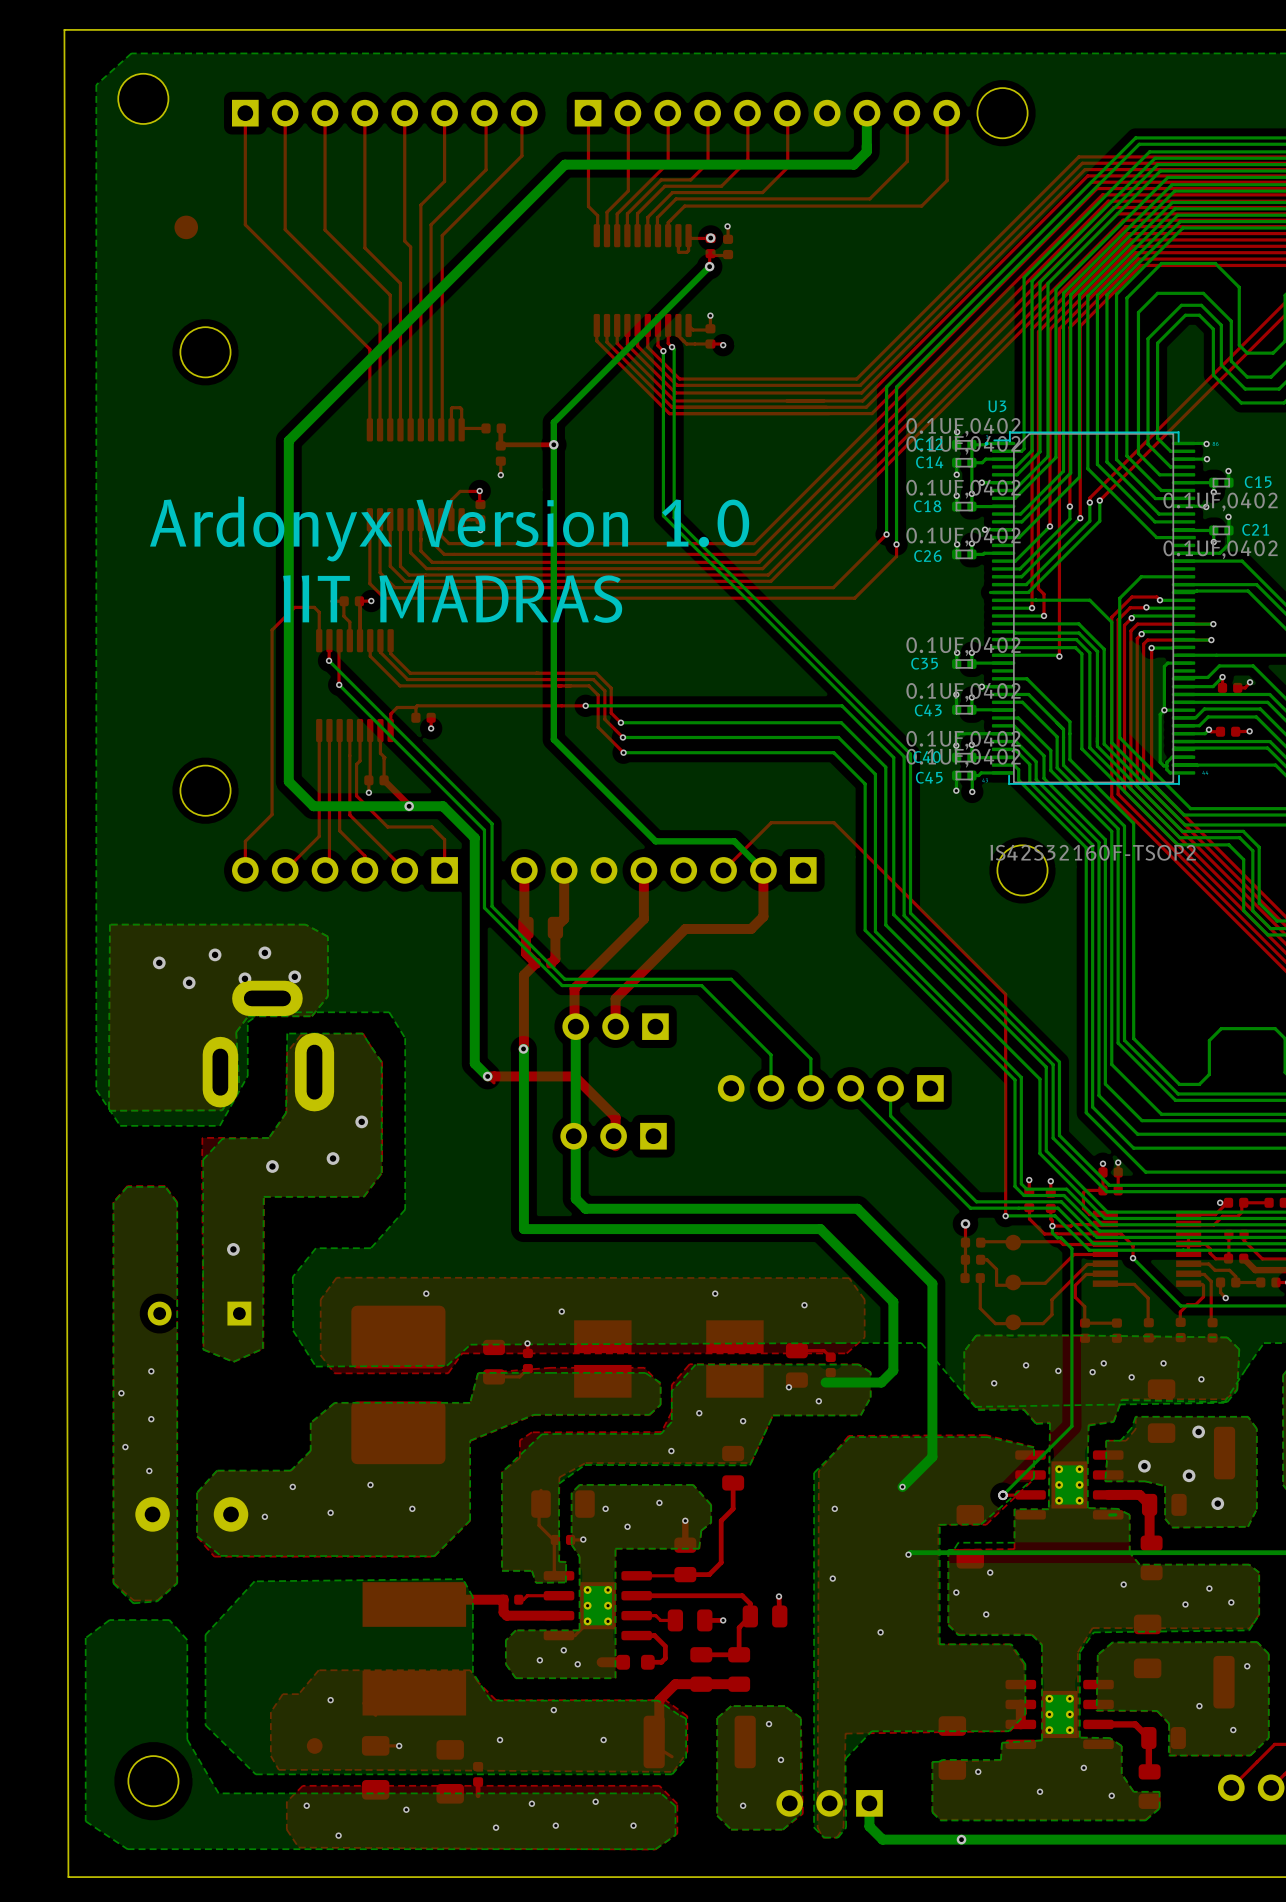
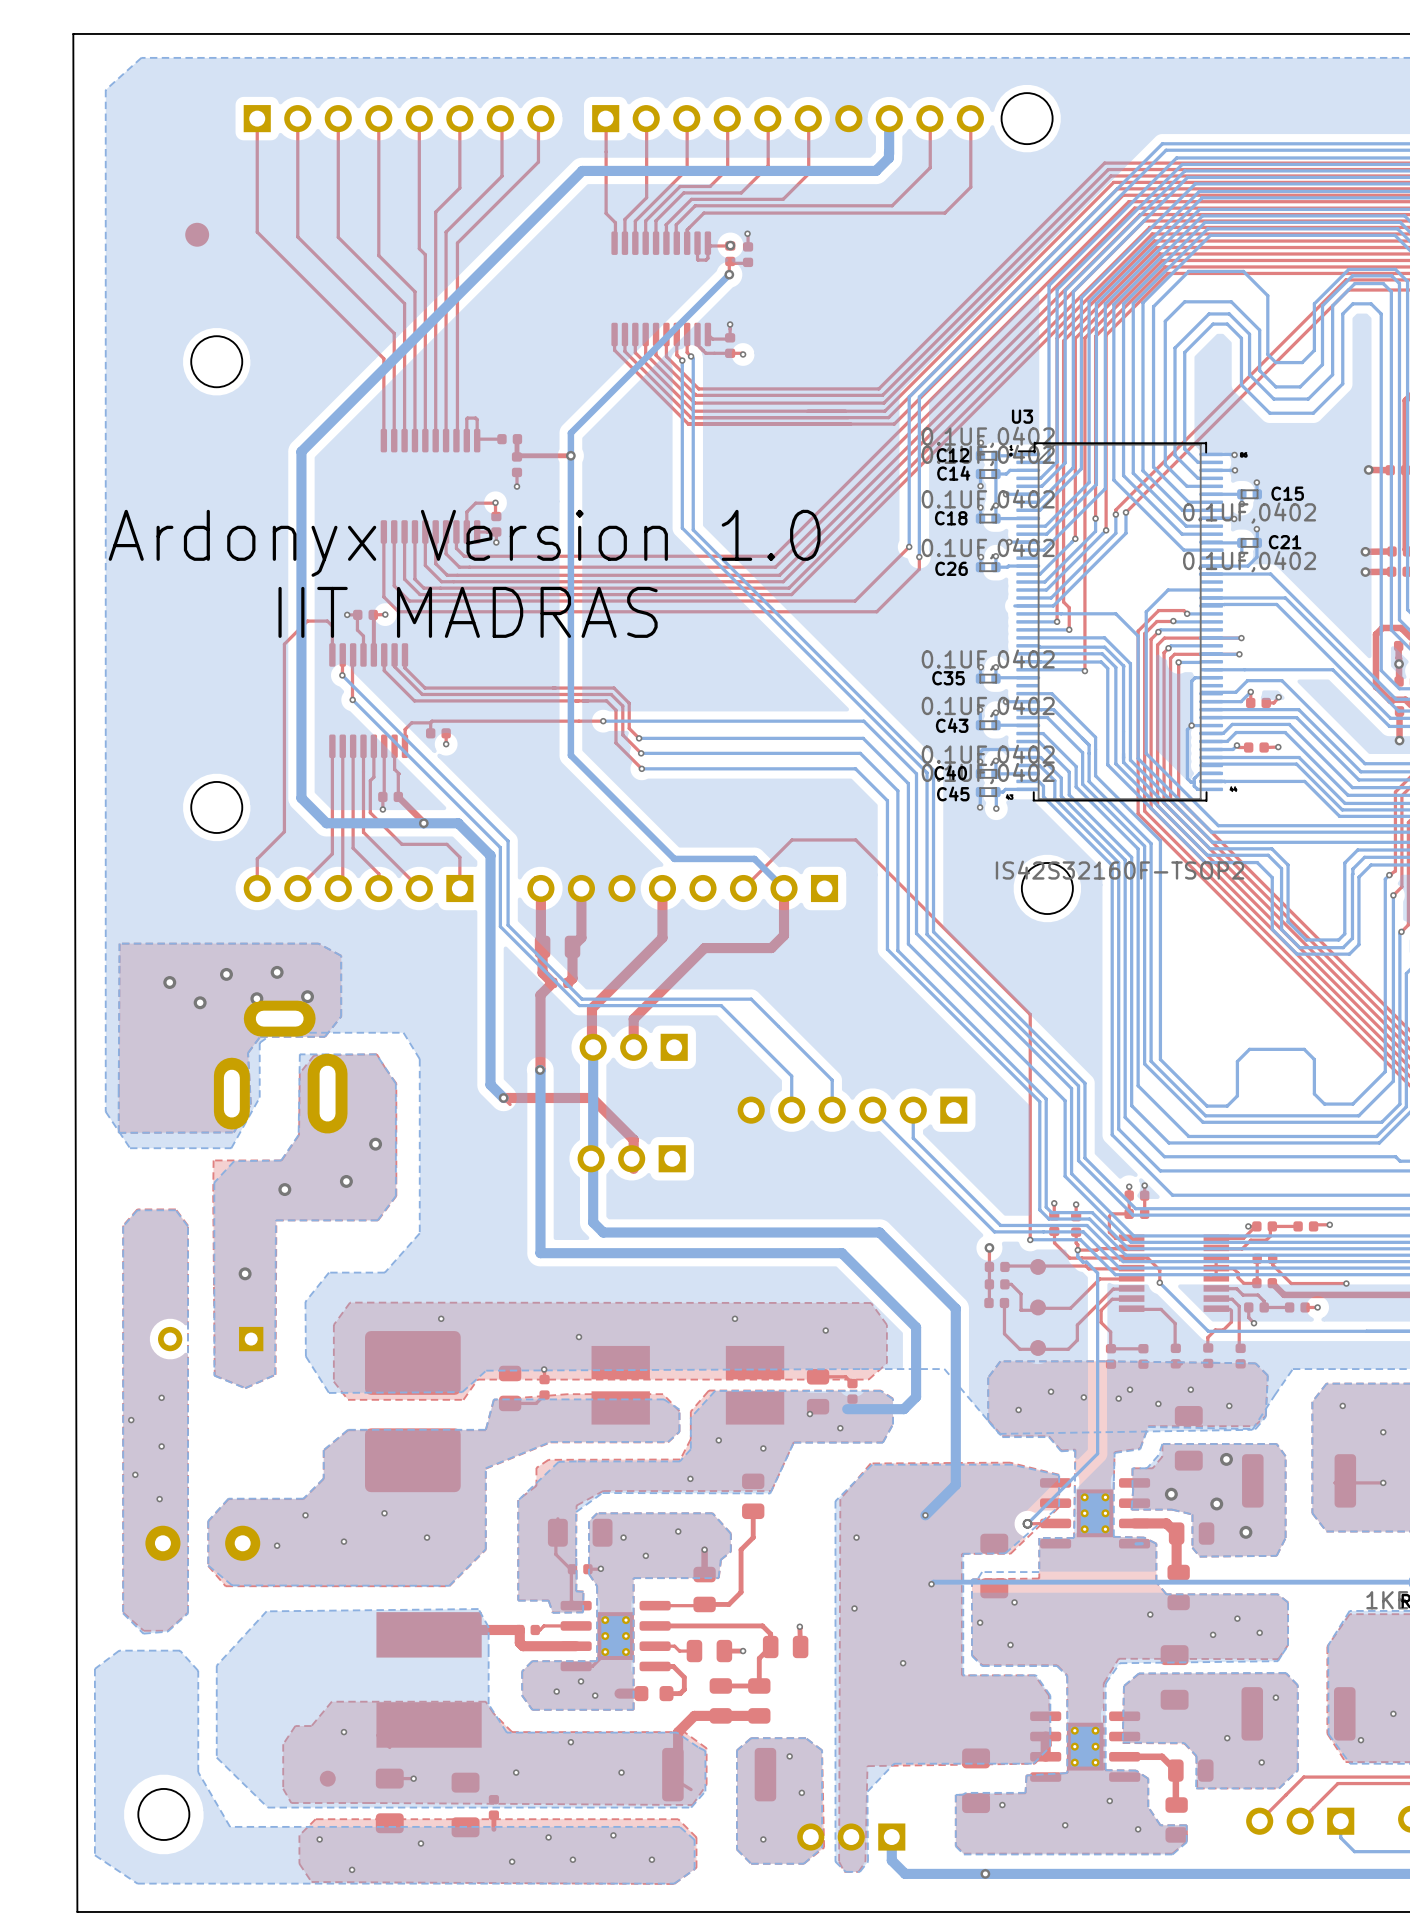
part: (143, 98) -> none

